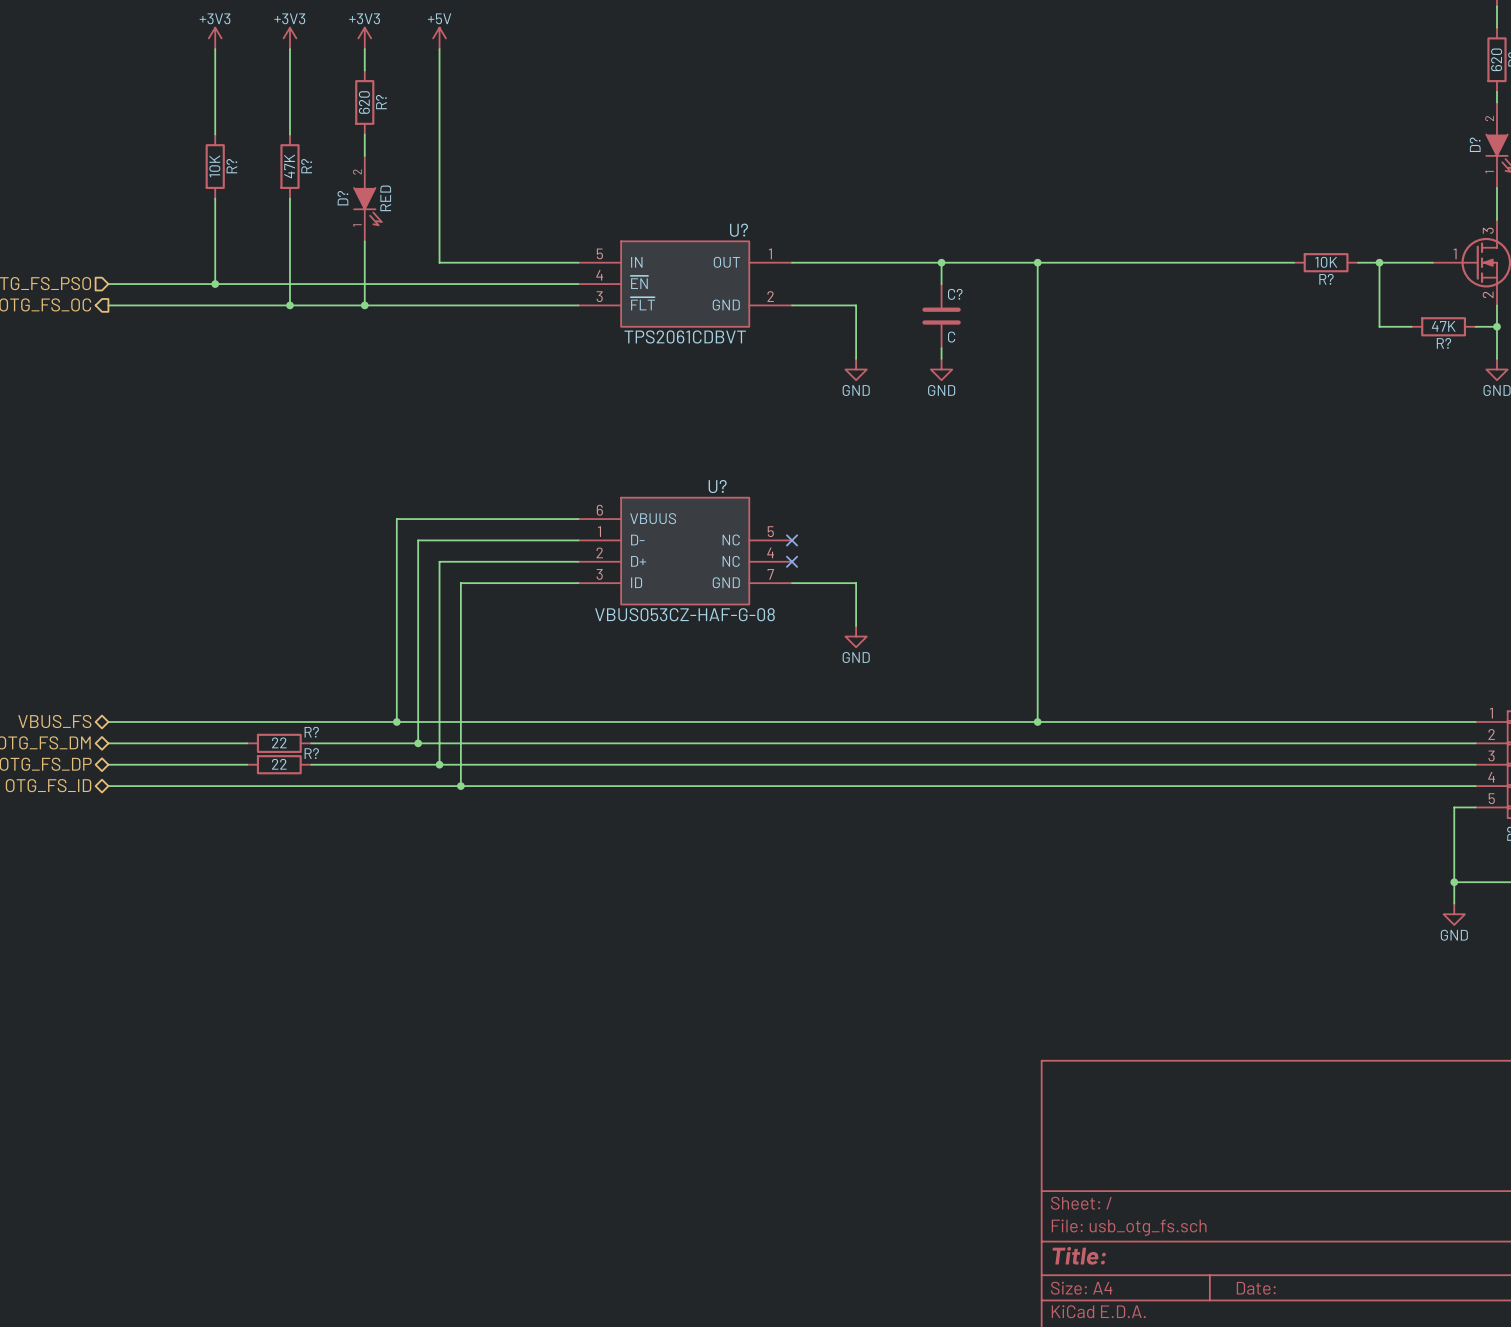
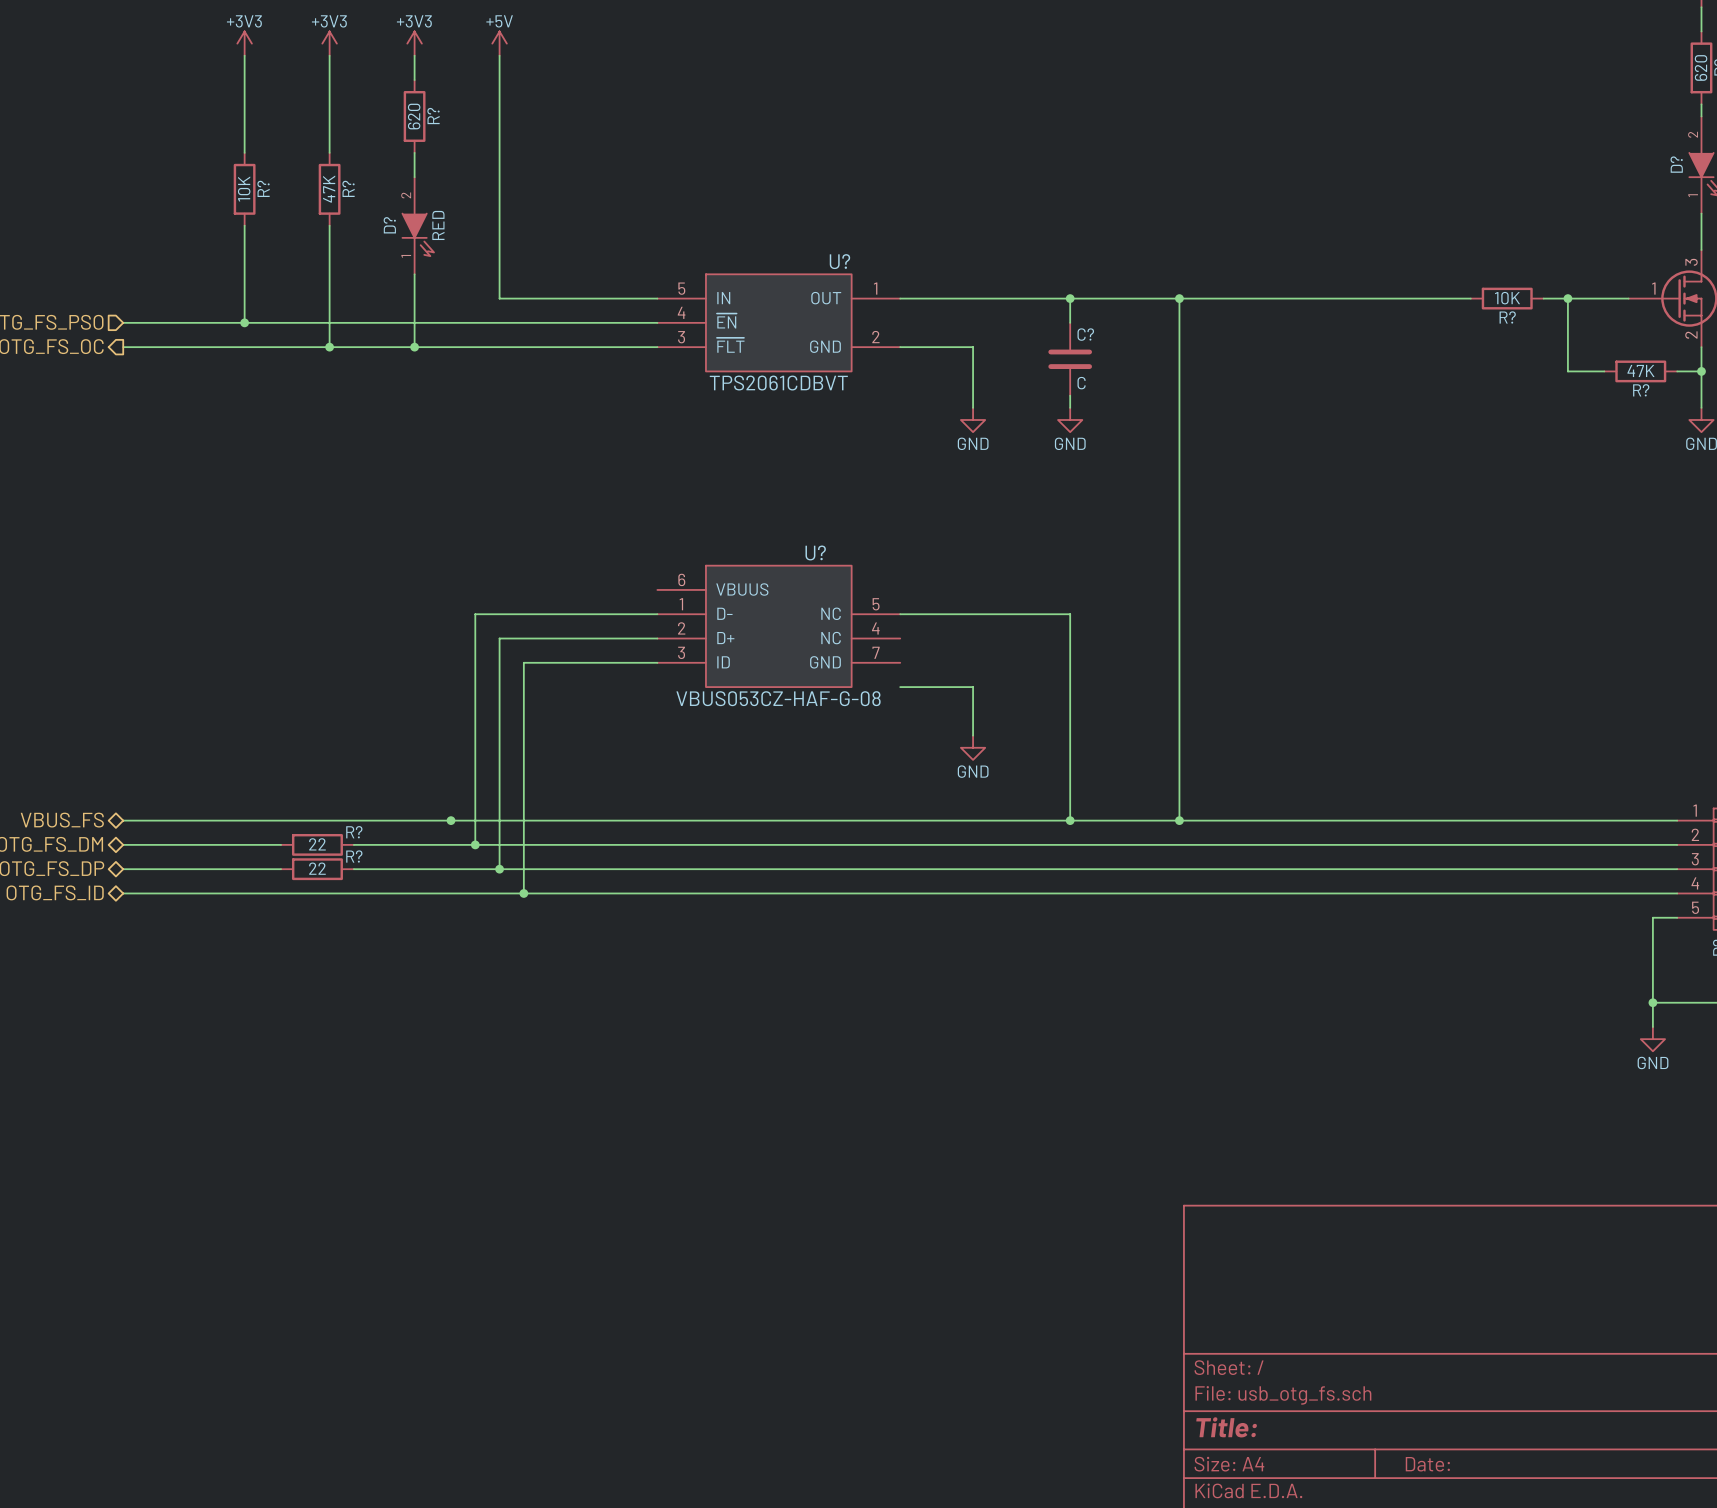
wire: (578, 519) (396, 519) (396, 721) -> none
wire: none -> (900, 614) (1070, 614) (1070, 820)
no-connect mark: (792, 540) -> none
no-connect mark: (792, 561) -> none
wire: (792, 583) (856, 583) (856, 604) -> (900, 687) (973, 687)
power symbol position: GND (856, 636) -> GND (973, 747)
junction: none -> (1070, 820)

